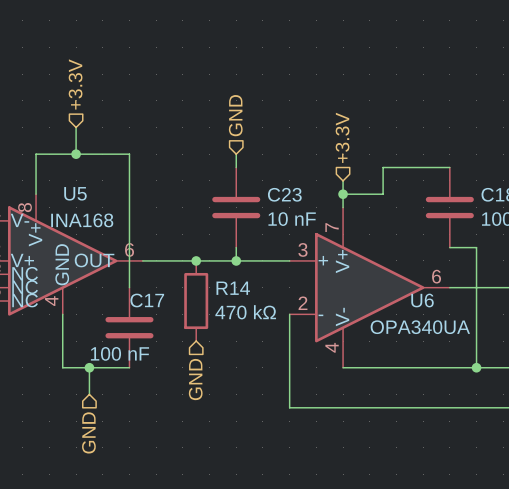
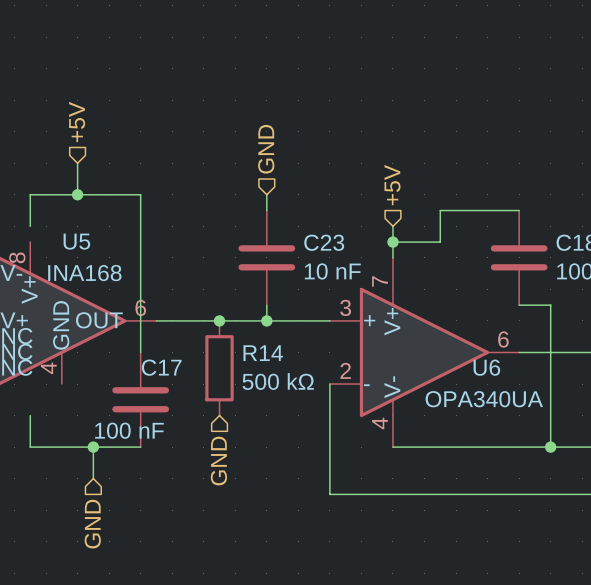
hierarchical label: +3.3V (75, 84) -> +5V (77, 121)
hierarchical label: +3.3V (342, 137) -> +5V (392, 185)
wire: (36, 180) (36, 194) -> none
R14 value: 470 kΩ (245, 312) -> 500 kΩ (278, 381)
wire: (62, 314) (62, 367) -> (30, 415) (30, 447) (61, 447)

